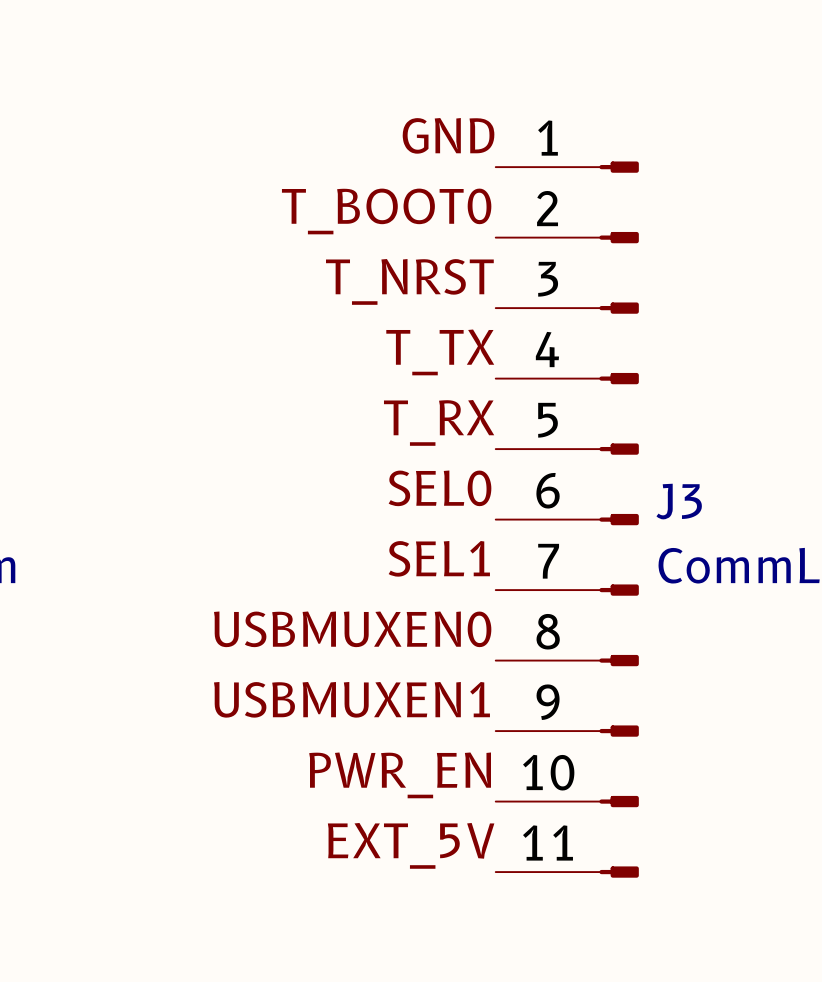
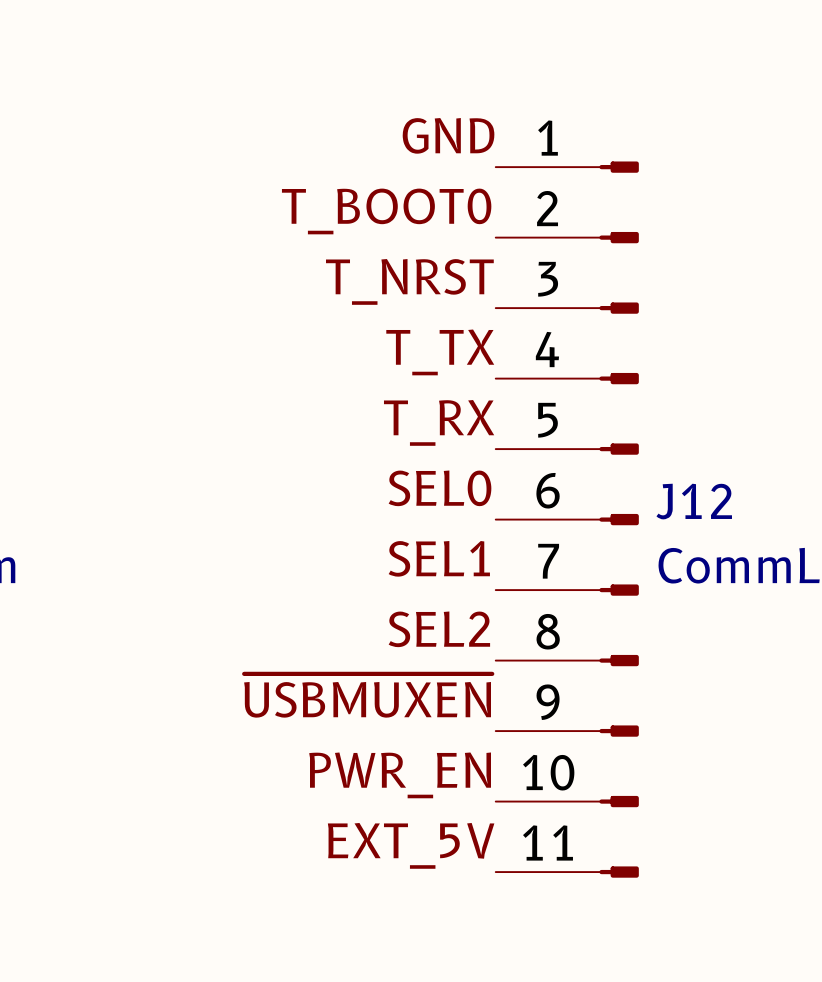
J3 name: J3 (679, 501) -> J12 (694, 501)
label: USBMUXEN0 (352, 629) -> SEL2 (439, 629)
label: USBMUXEN1 (351, 699) -> ~{USBMUXEN} (368, 695)

